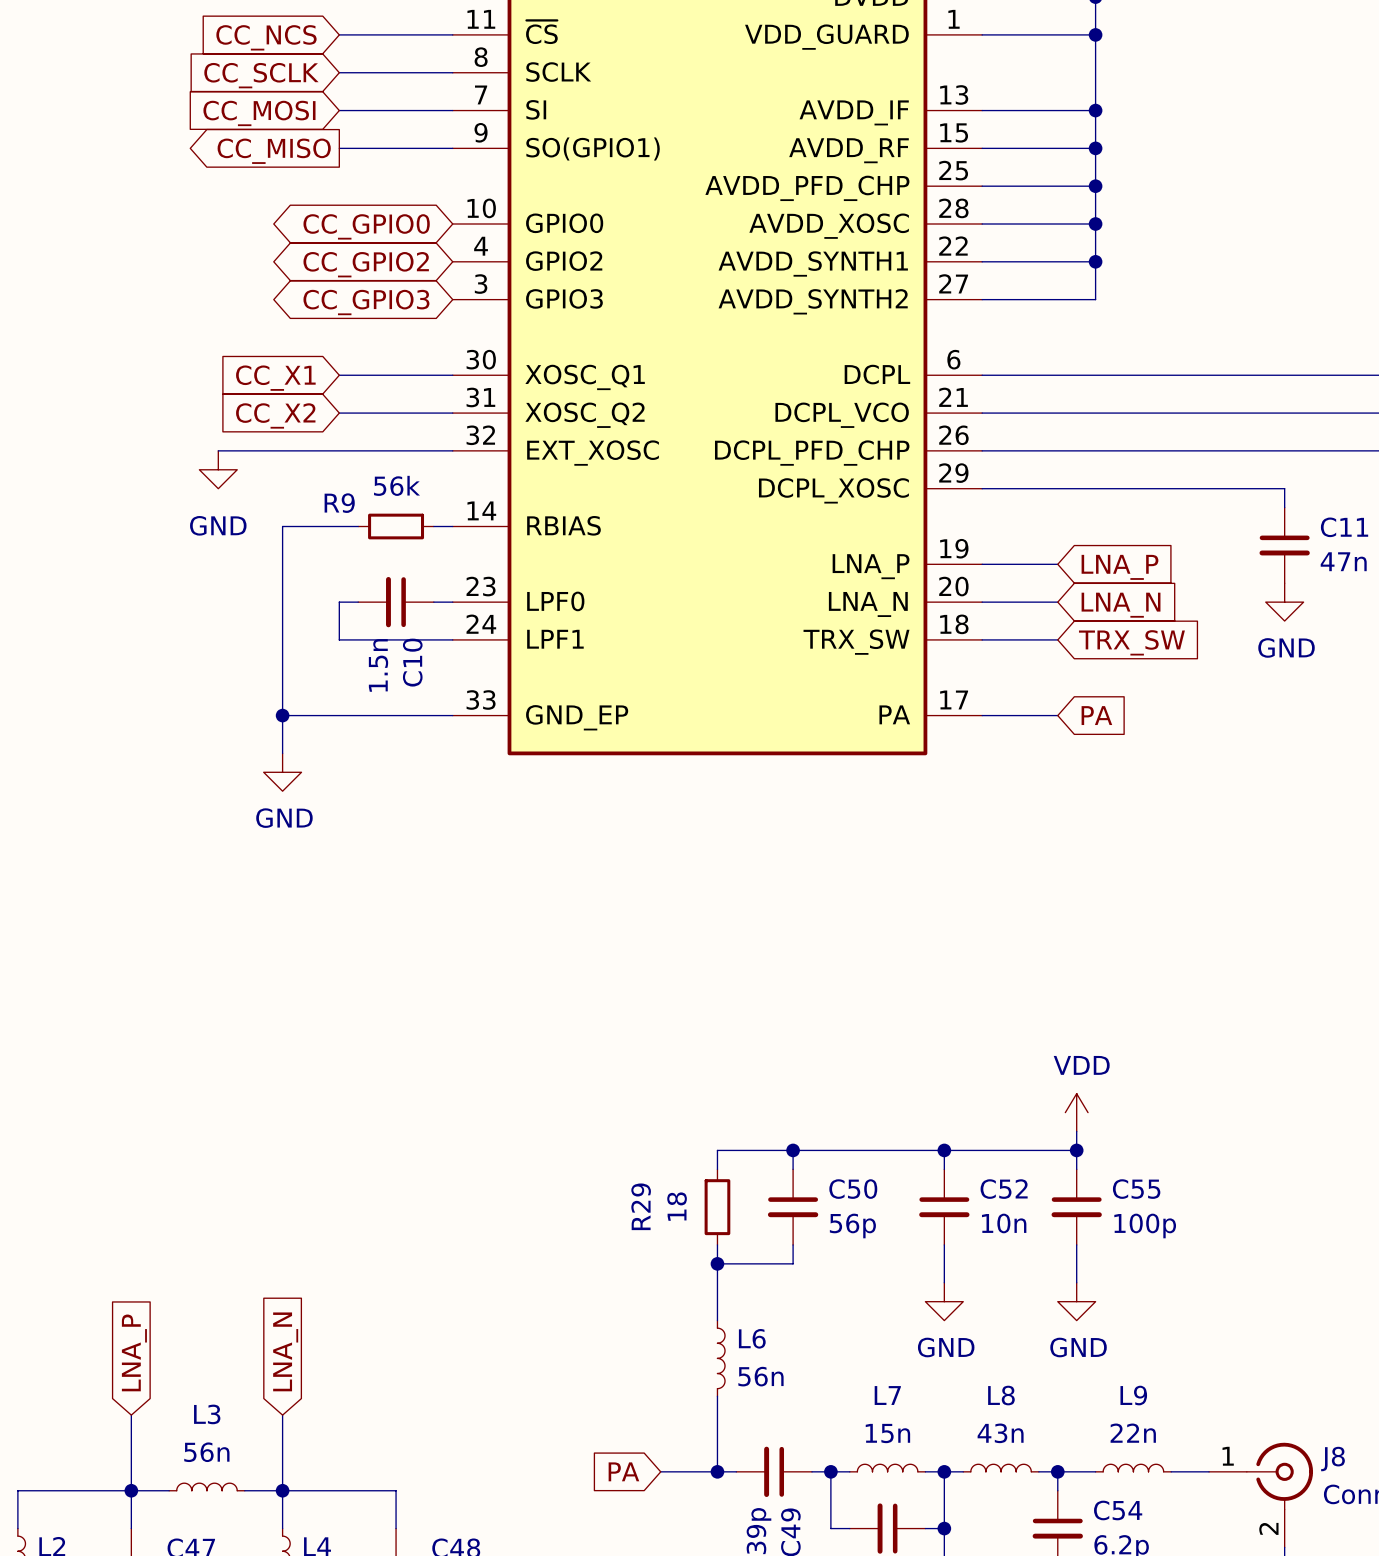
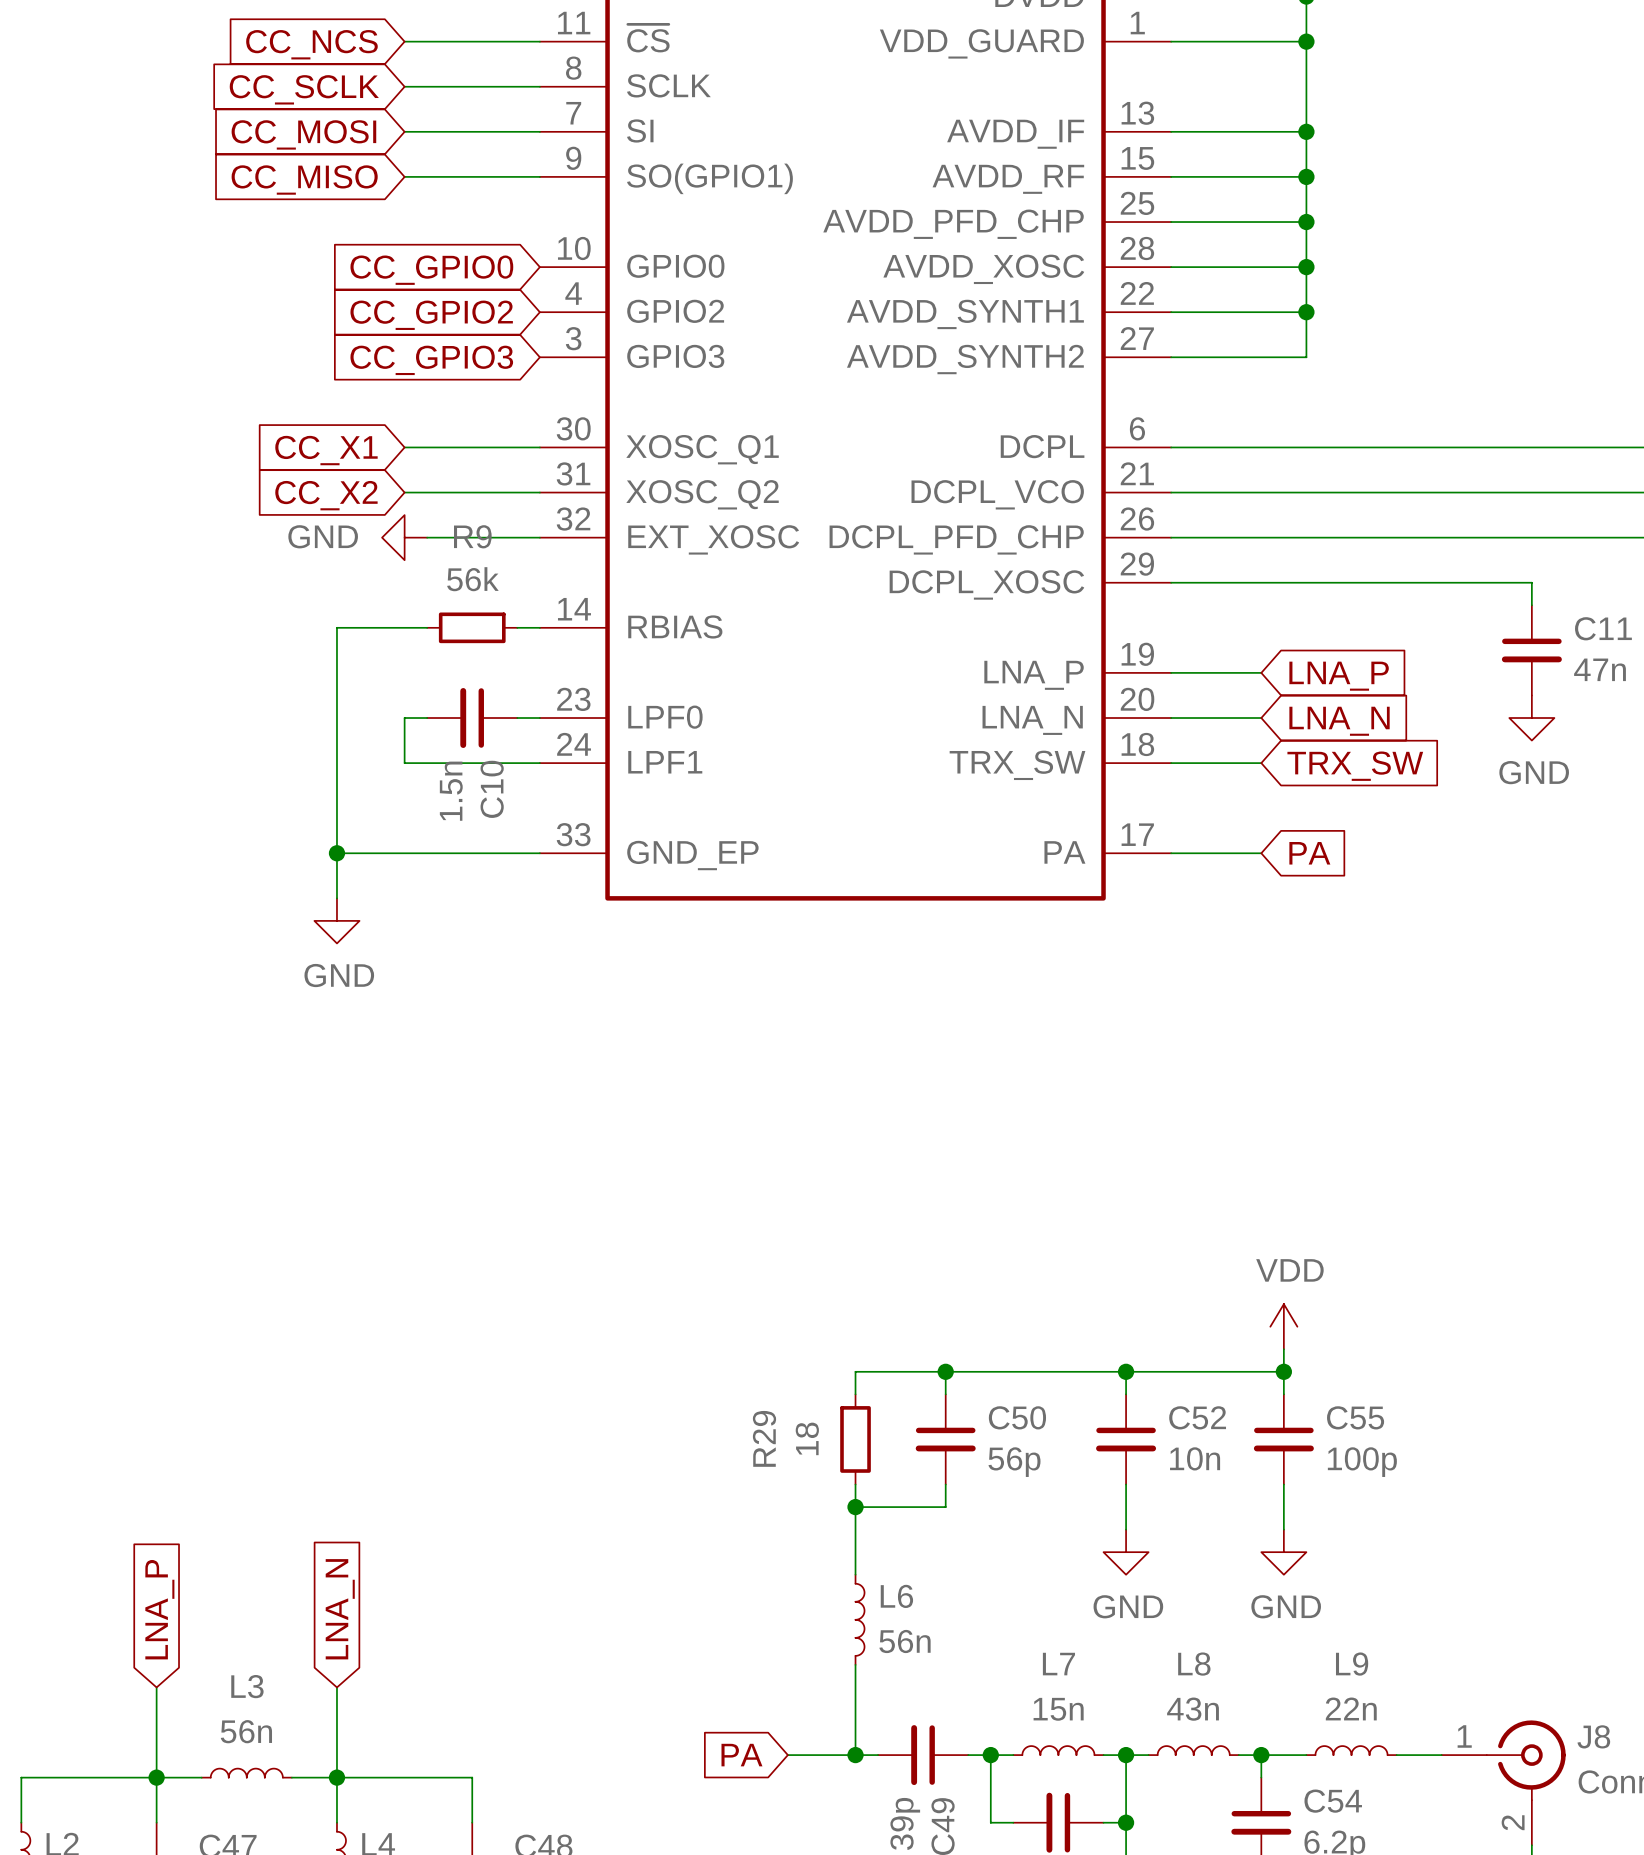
global label shape: output (274, 151) -> input (304, 180)
global label shape: bidirectional (366, 226) -> input (431, 270)
global label shape: bidirectional (366, 264) -> input (431, 315)
global label shape: bidirectional (366, 302) -> input (431, 360)
wire: (218, 450) (358, 450) -> none
power symbol rotation: 0° (218, 469) -> 90° clockwise (404, 537)
power symbol position: GND (218, 469) -> GND (404, 537)
R9 name position: R9 (339, 503) -> R9 (472, 536)

